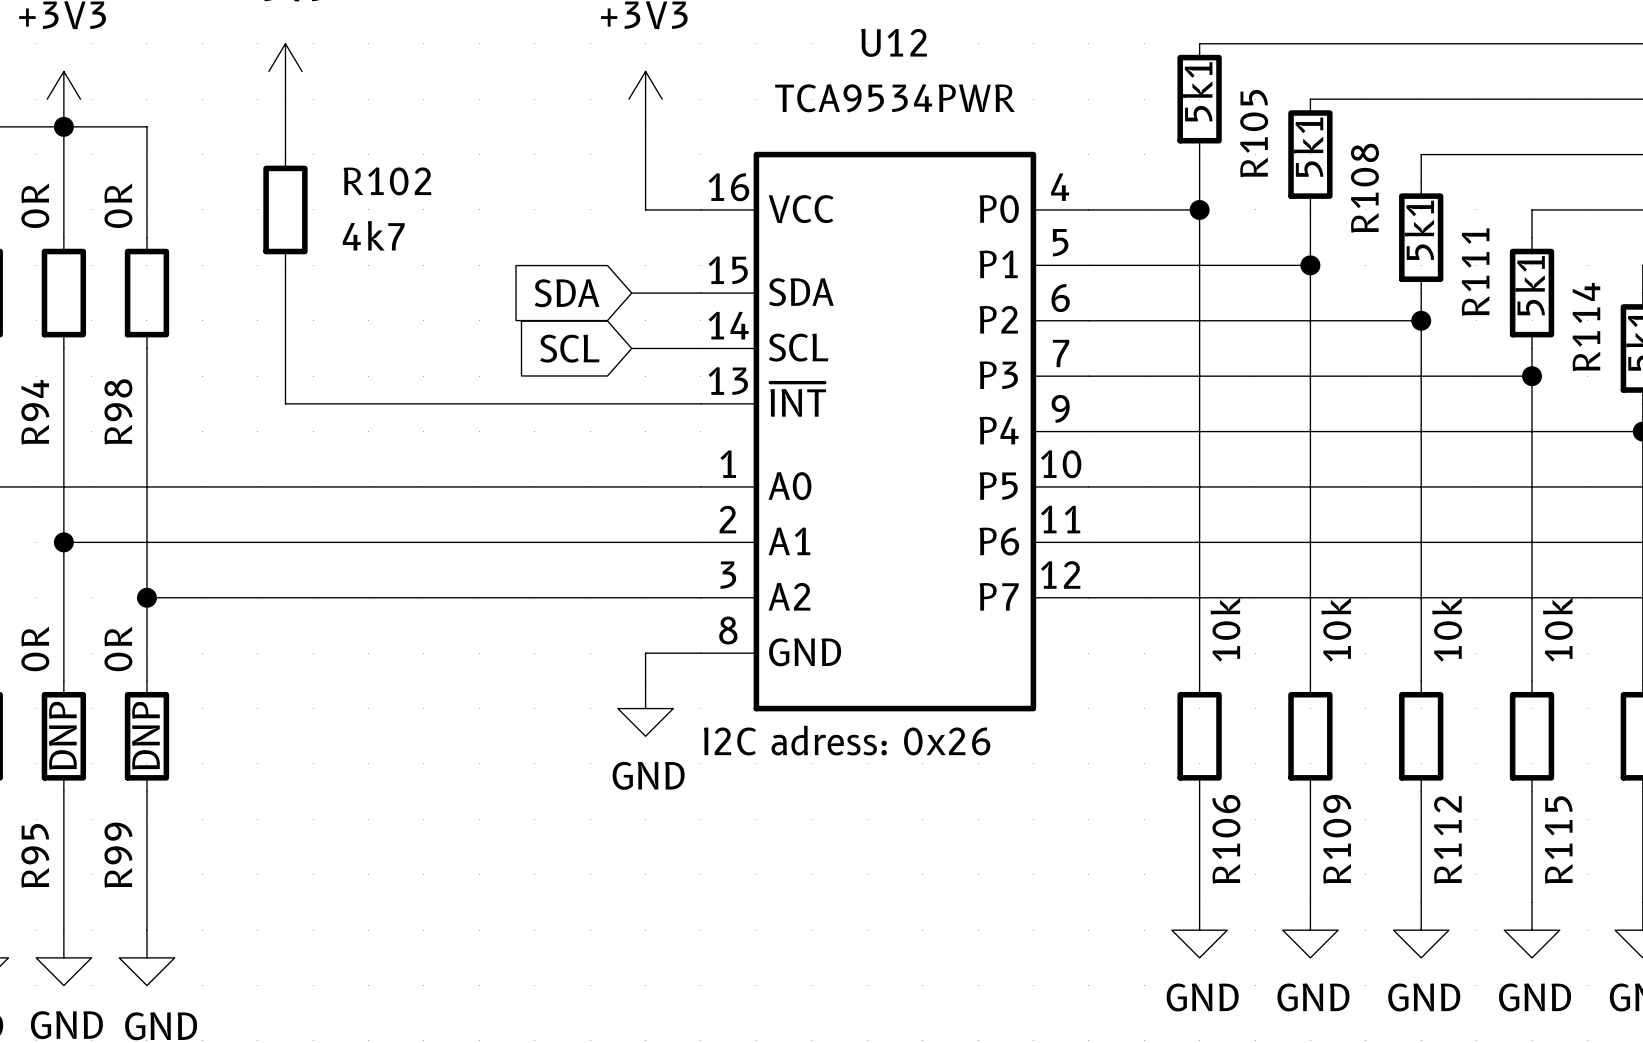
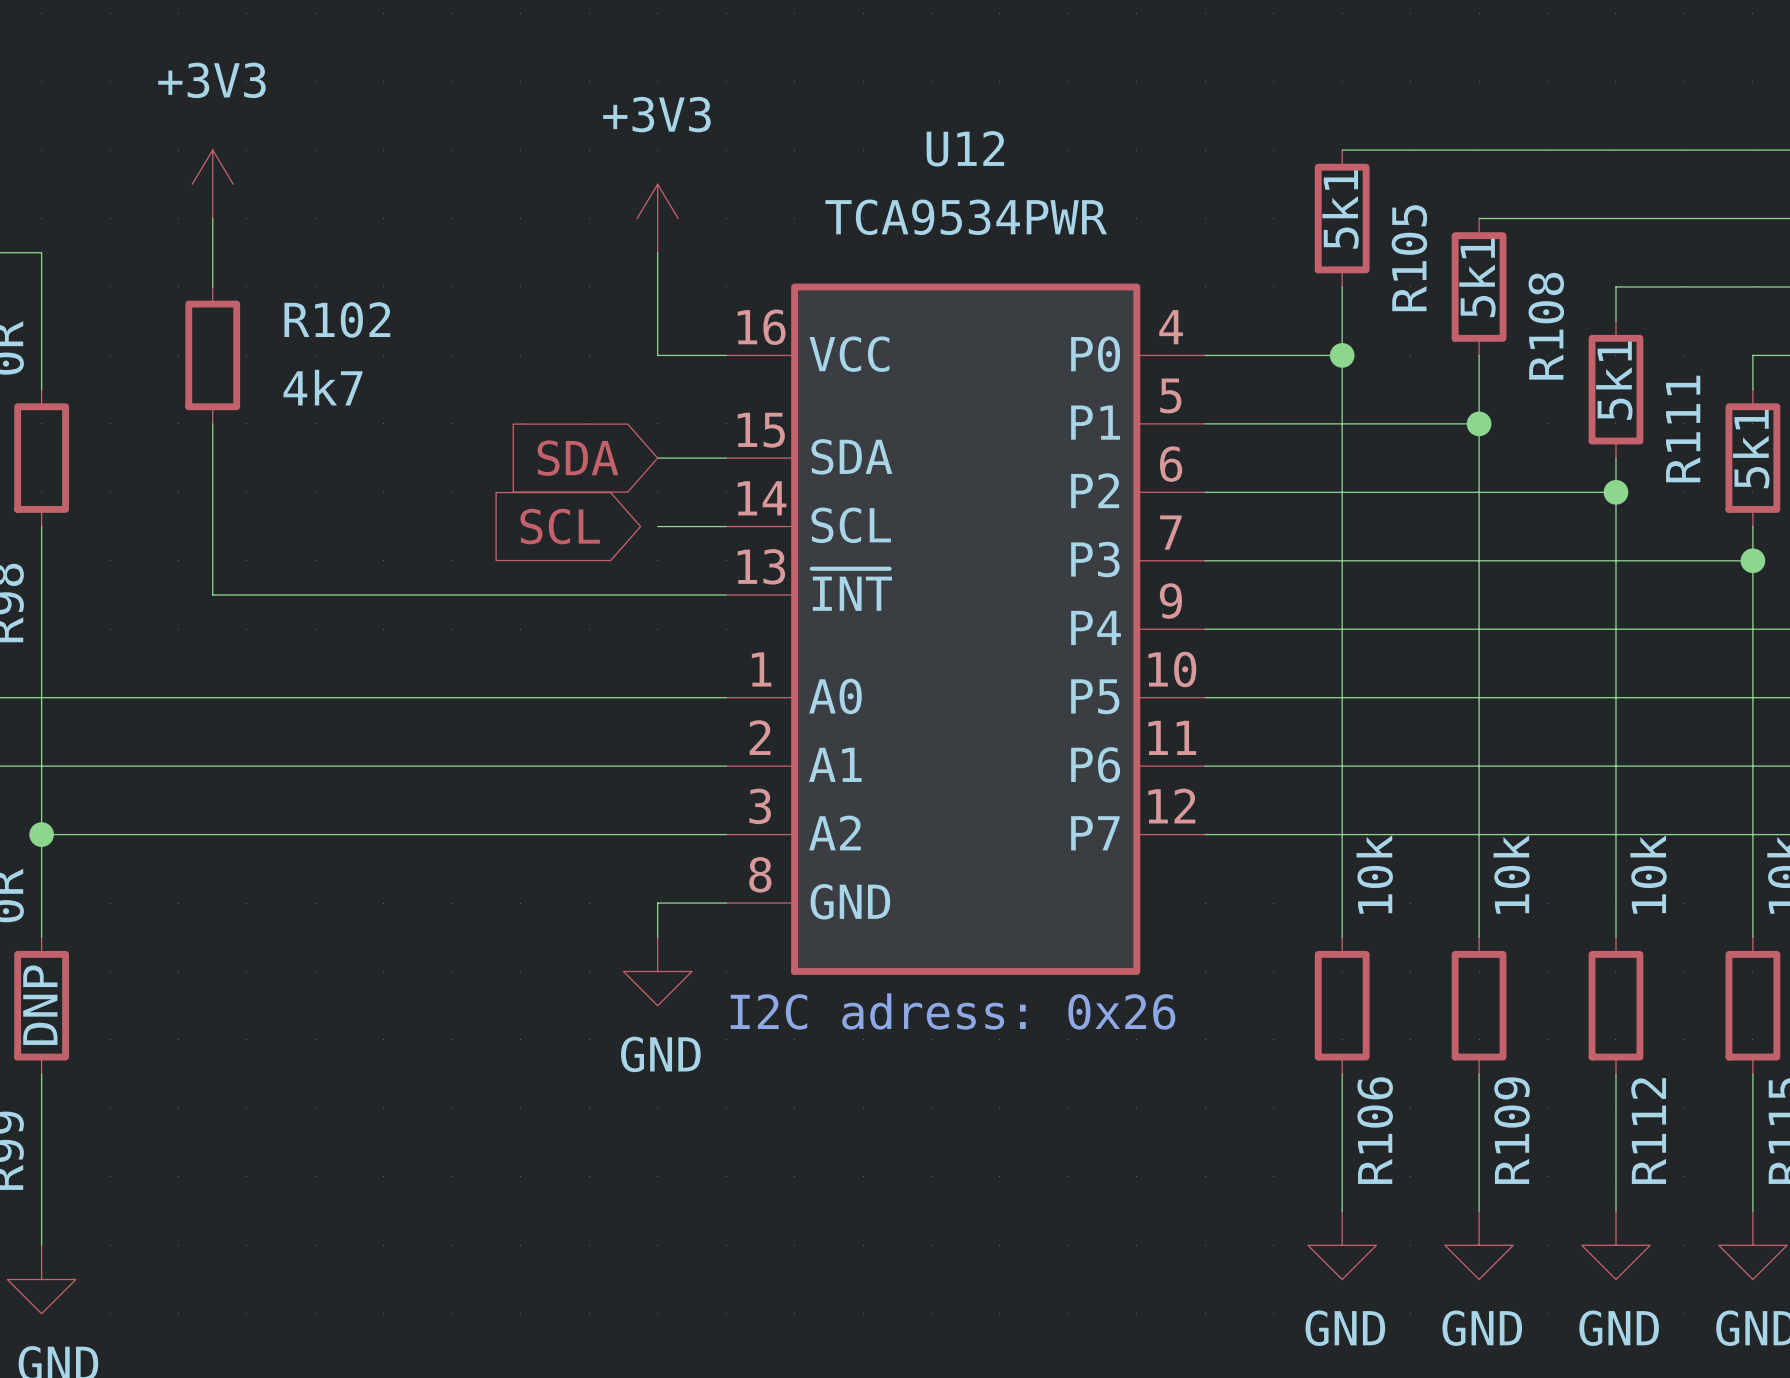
global label position: SDA (567, 293) -> SDA (577, 458)
wire: (631, 293) (645, 293) -> none
wire: (631, 348) (645, 348) -> none

